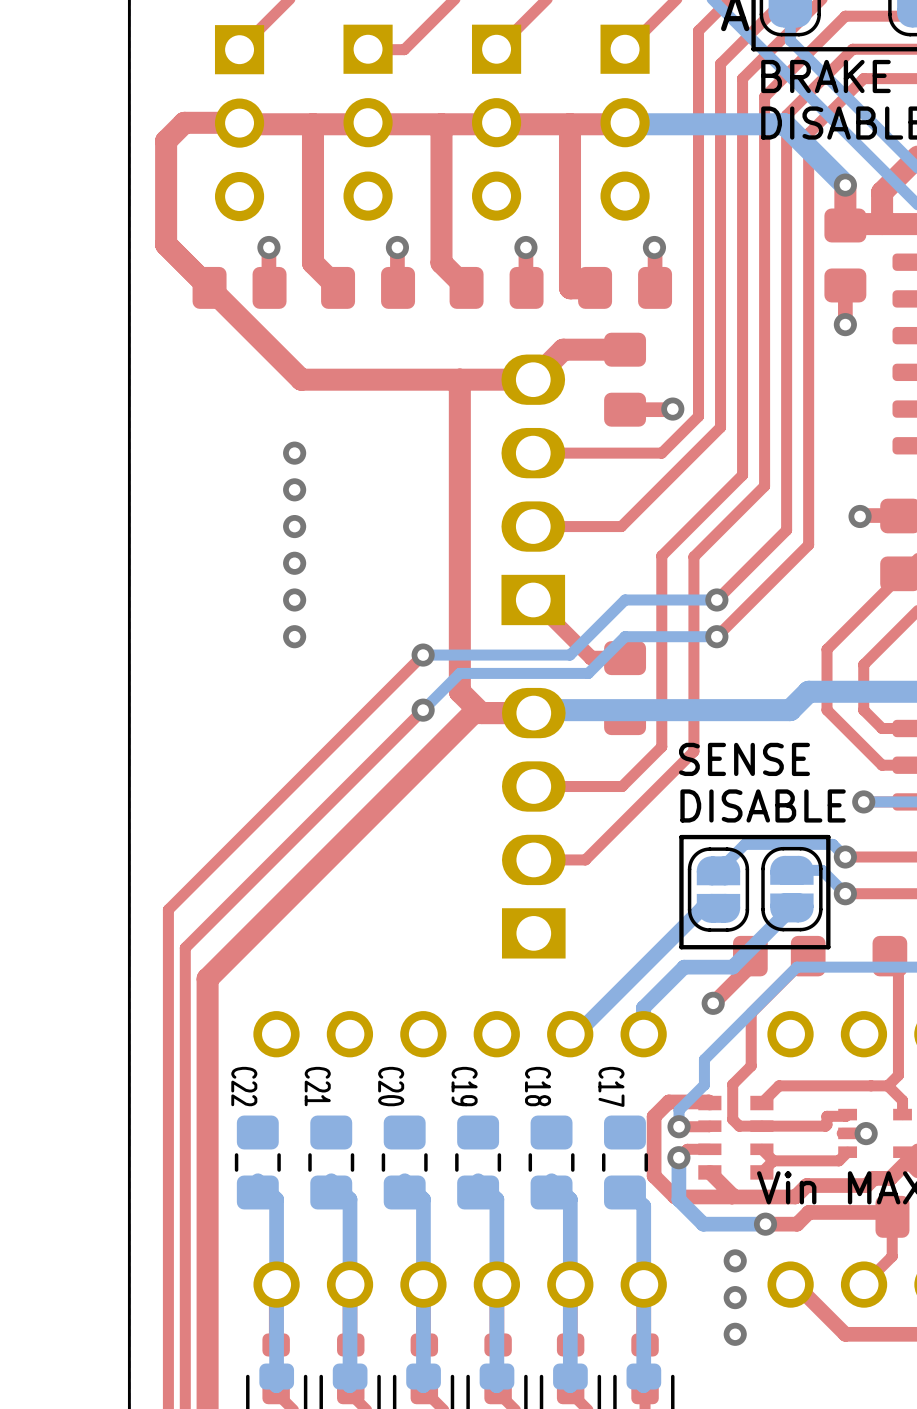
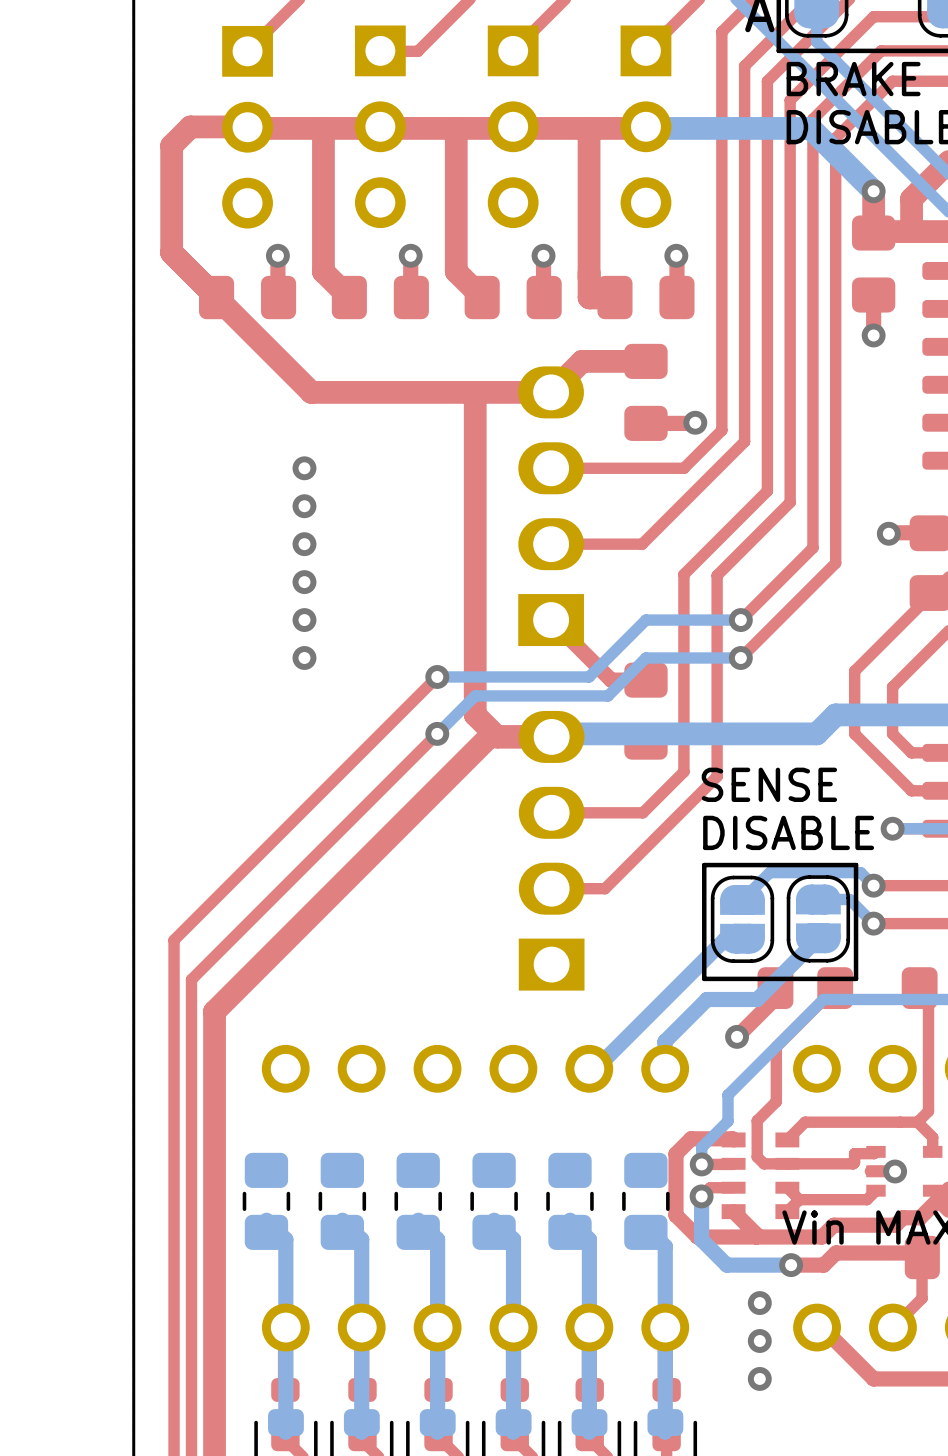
C22 name: C22 (244, 1086) -> none
C21 name: C21 (317, 1086) -> none
C20 name: C20 (391, 1086) -> none
C19 name: C19 (464, 1086) -> none
C18 name: C18 (538, 1086) -> none
C17 name: C17 (611, 1086) -> none

